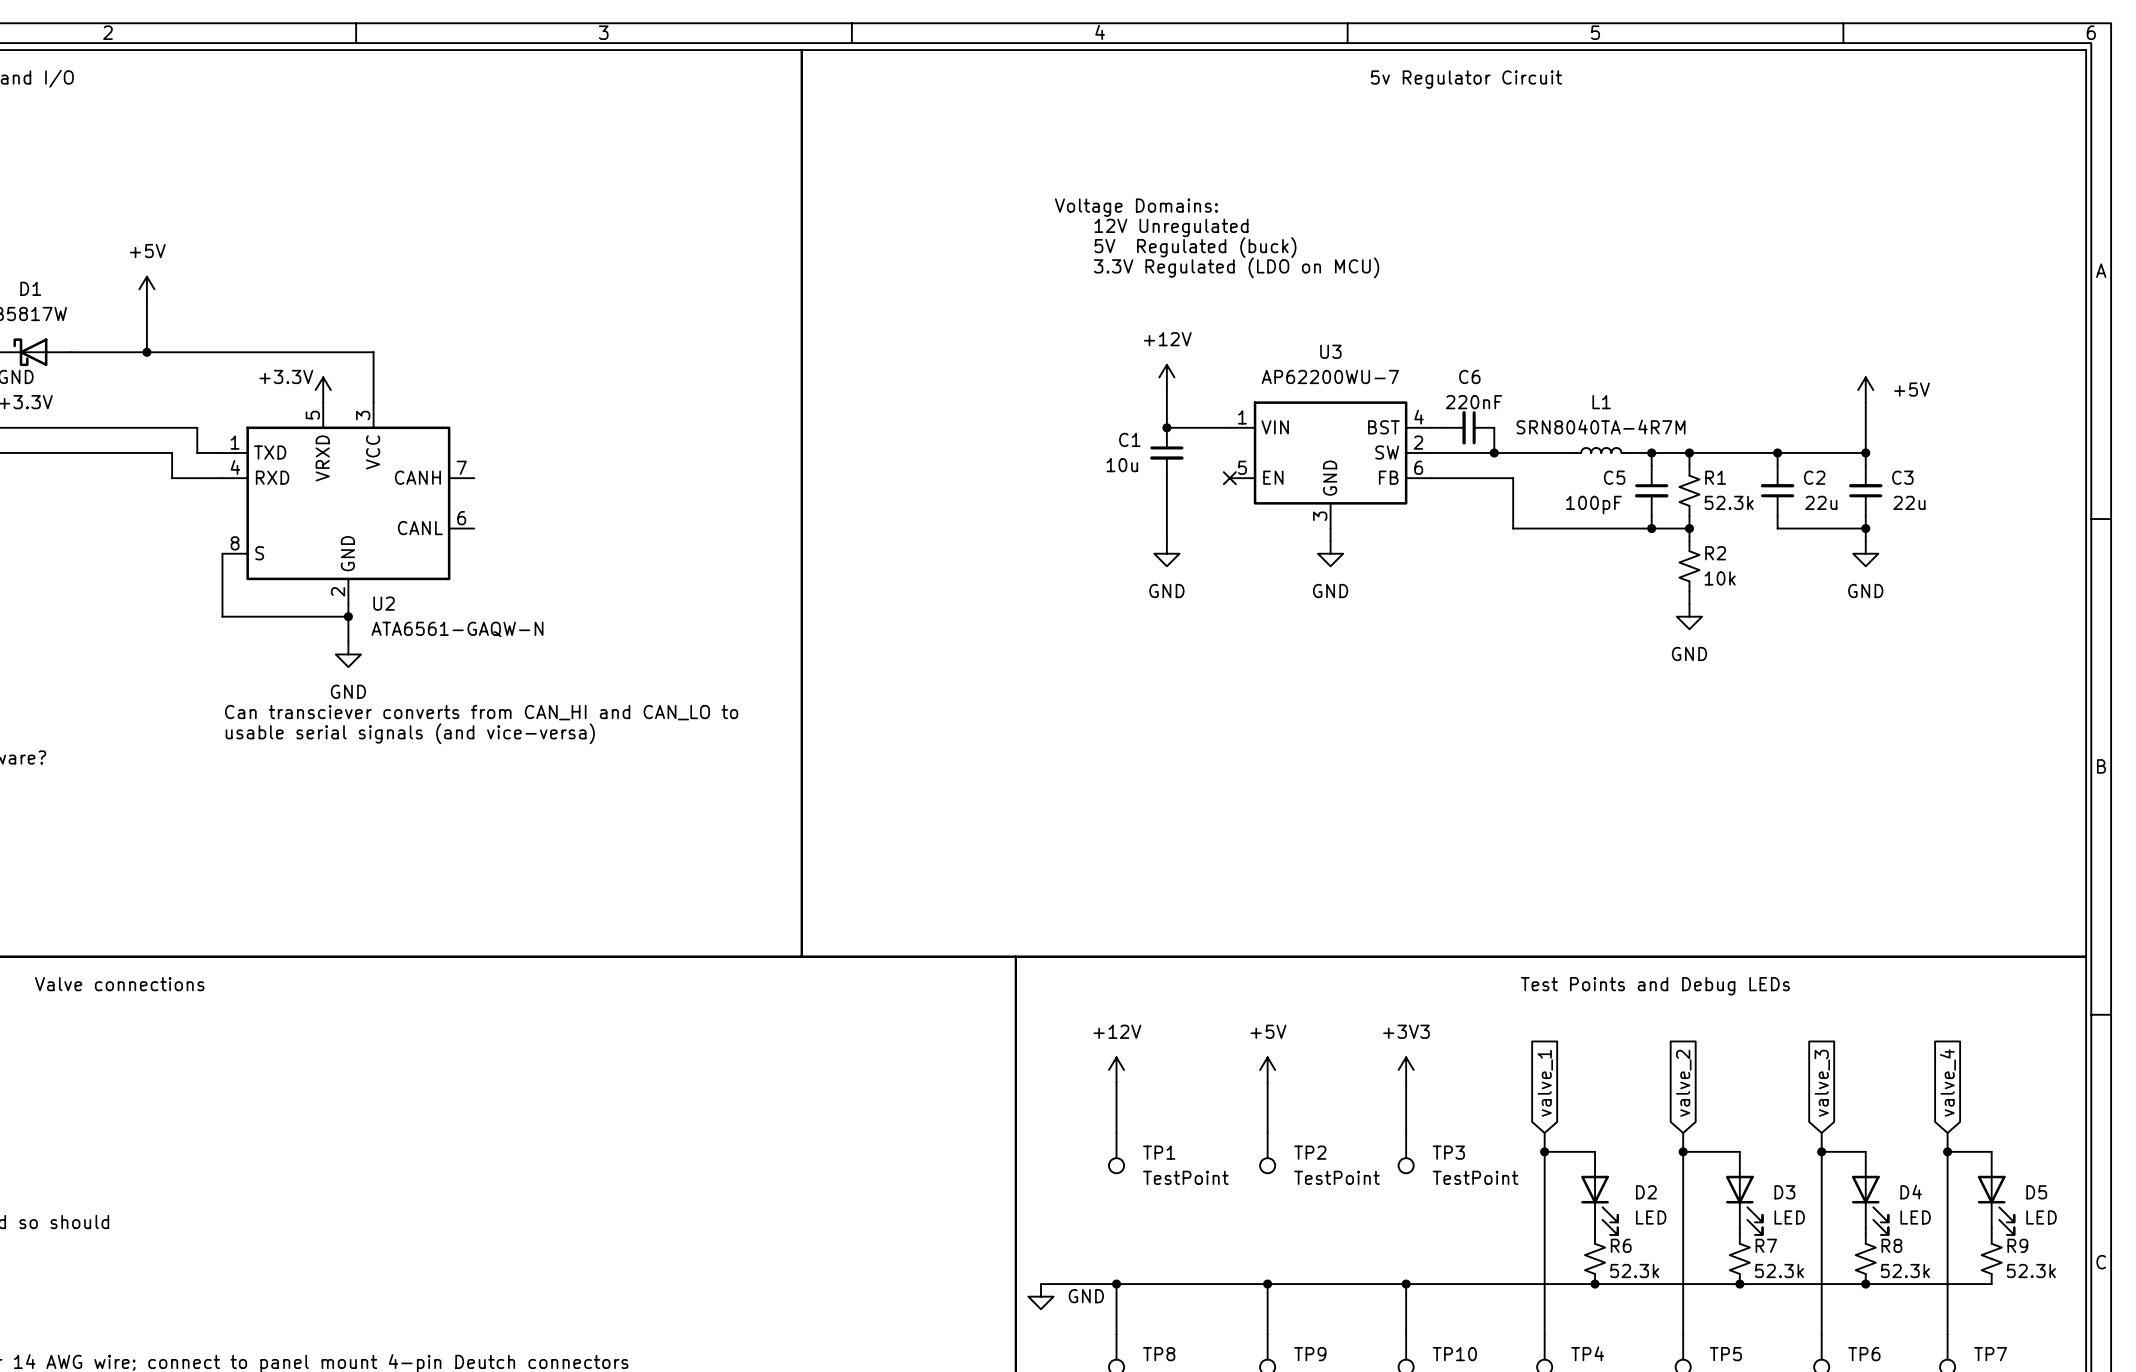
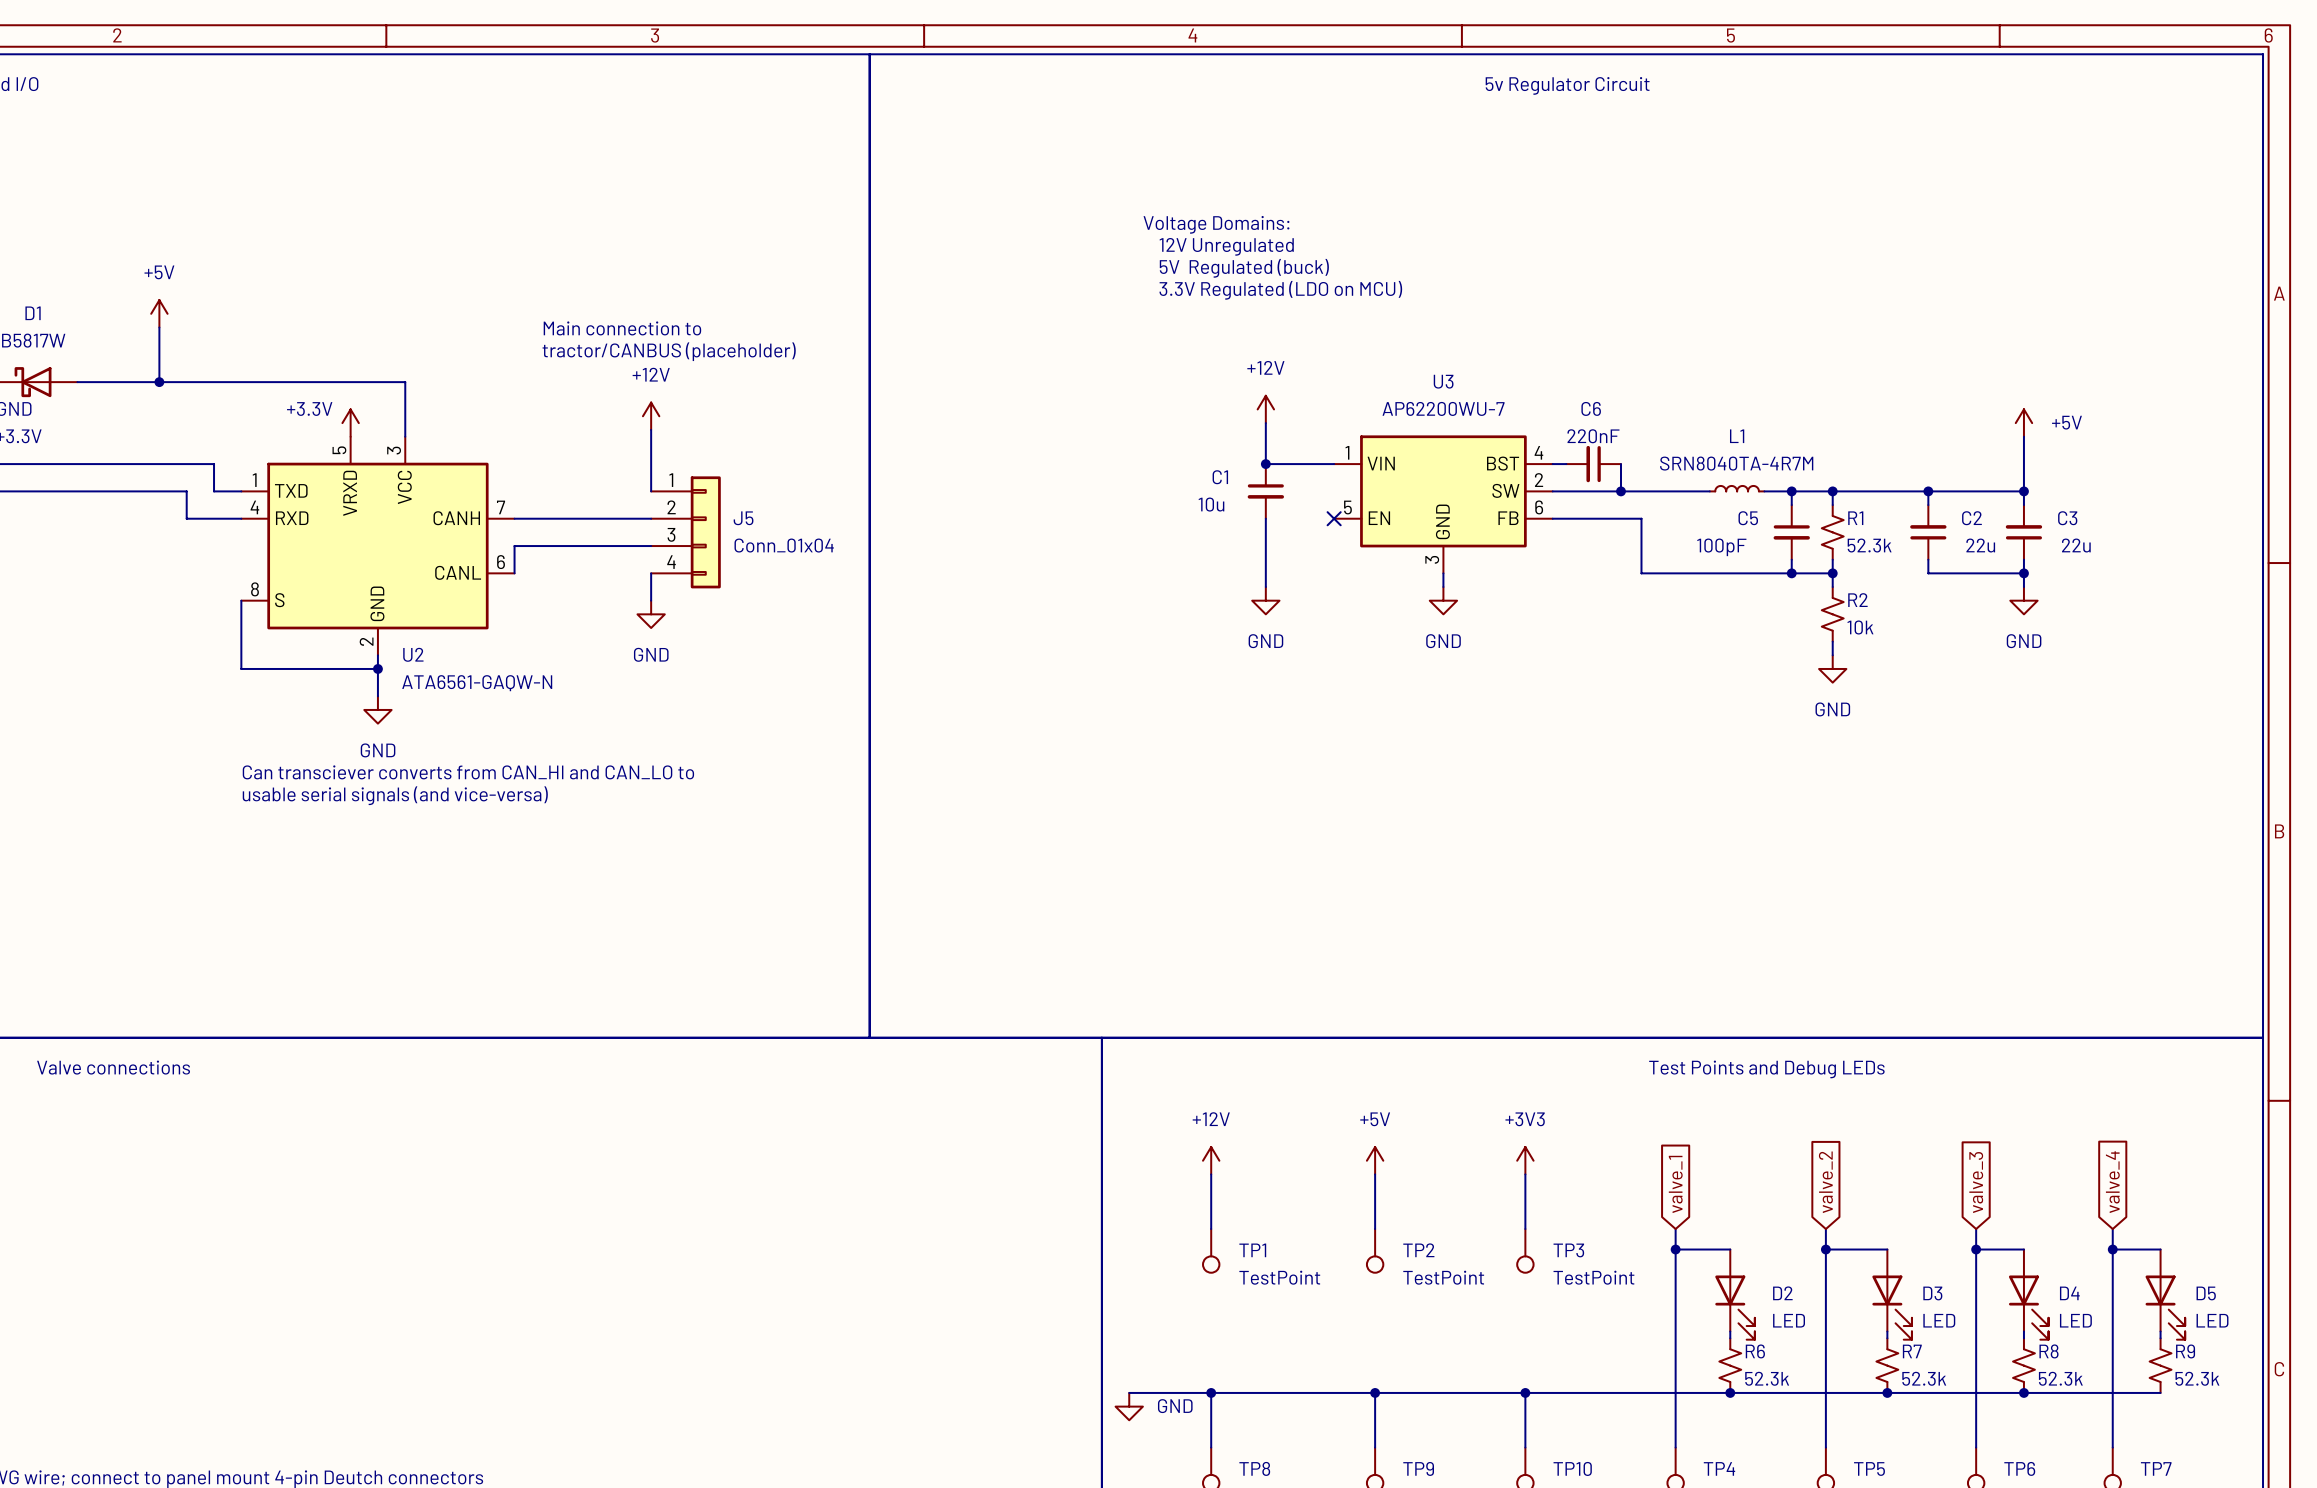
text: none -> Main connection to (622, 328)
text: none -> tractor/CANBUS (placeholder) (669, 351)
power symbol: none -> +12V (651, 416)
wire: none -> (651, 429) (651, 491)
wire: none -> (514, 518) (651, 518)
J5: none -> Conn_01x04 (685, 532)
wire: none -> (651, 546) (514, 546) (514, 573)
wire: none -> (651, 573) (651, 600)
power symbol: none -> GND (651, 614)

